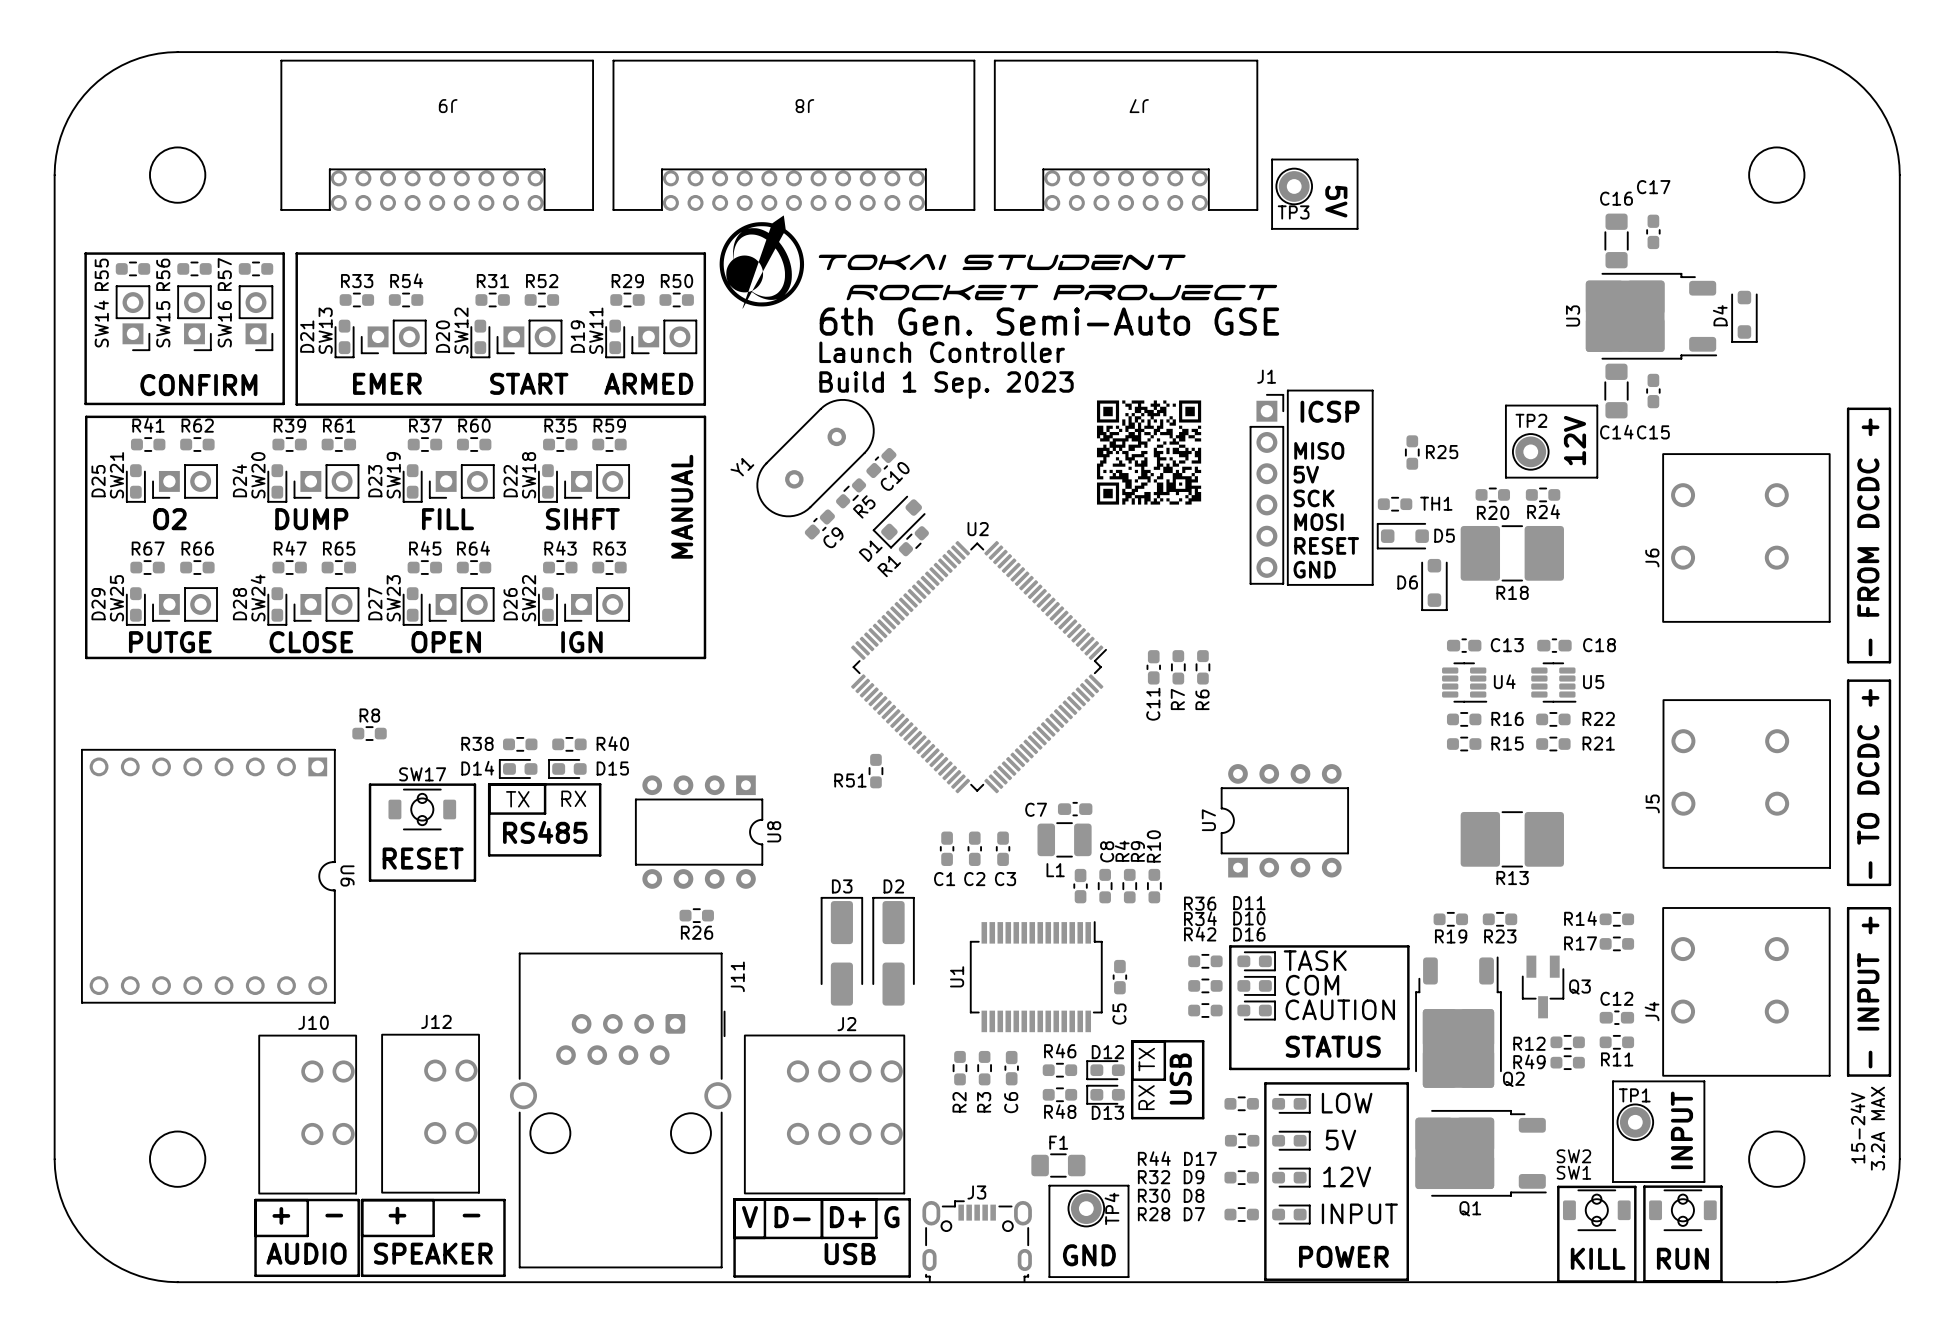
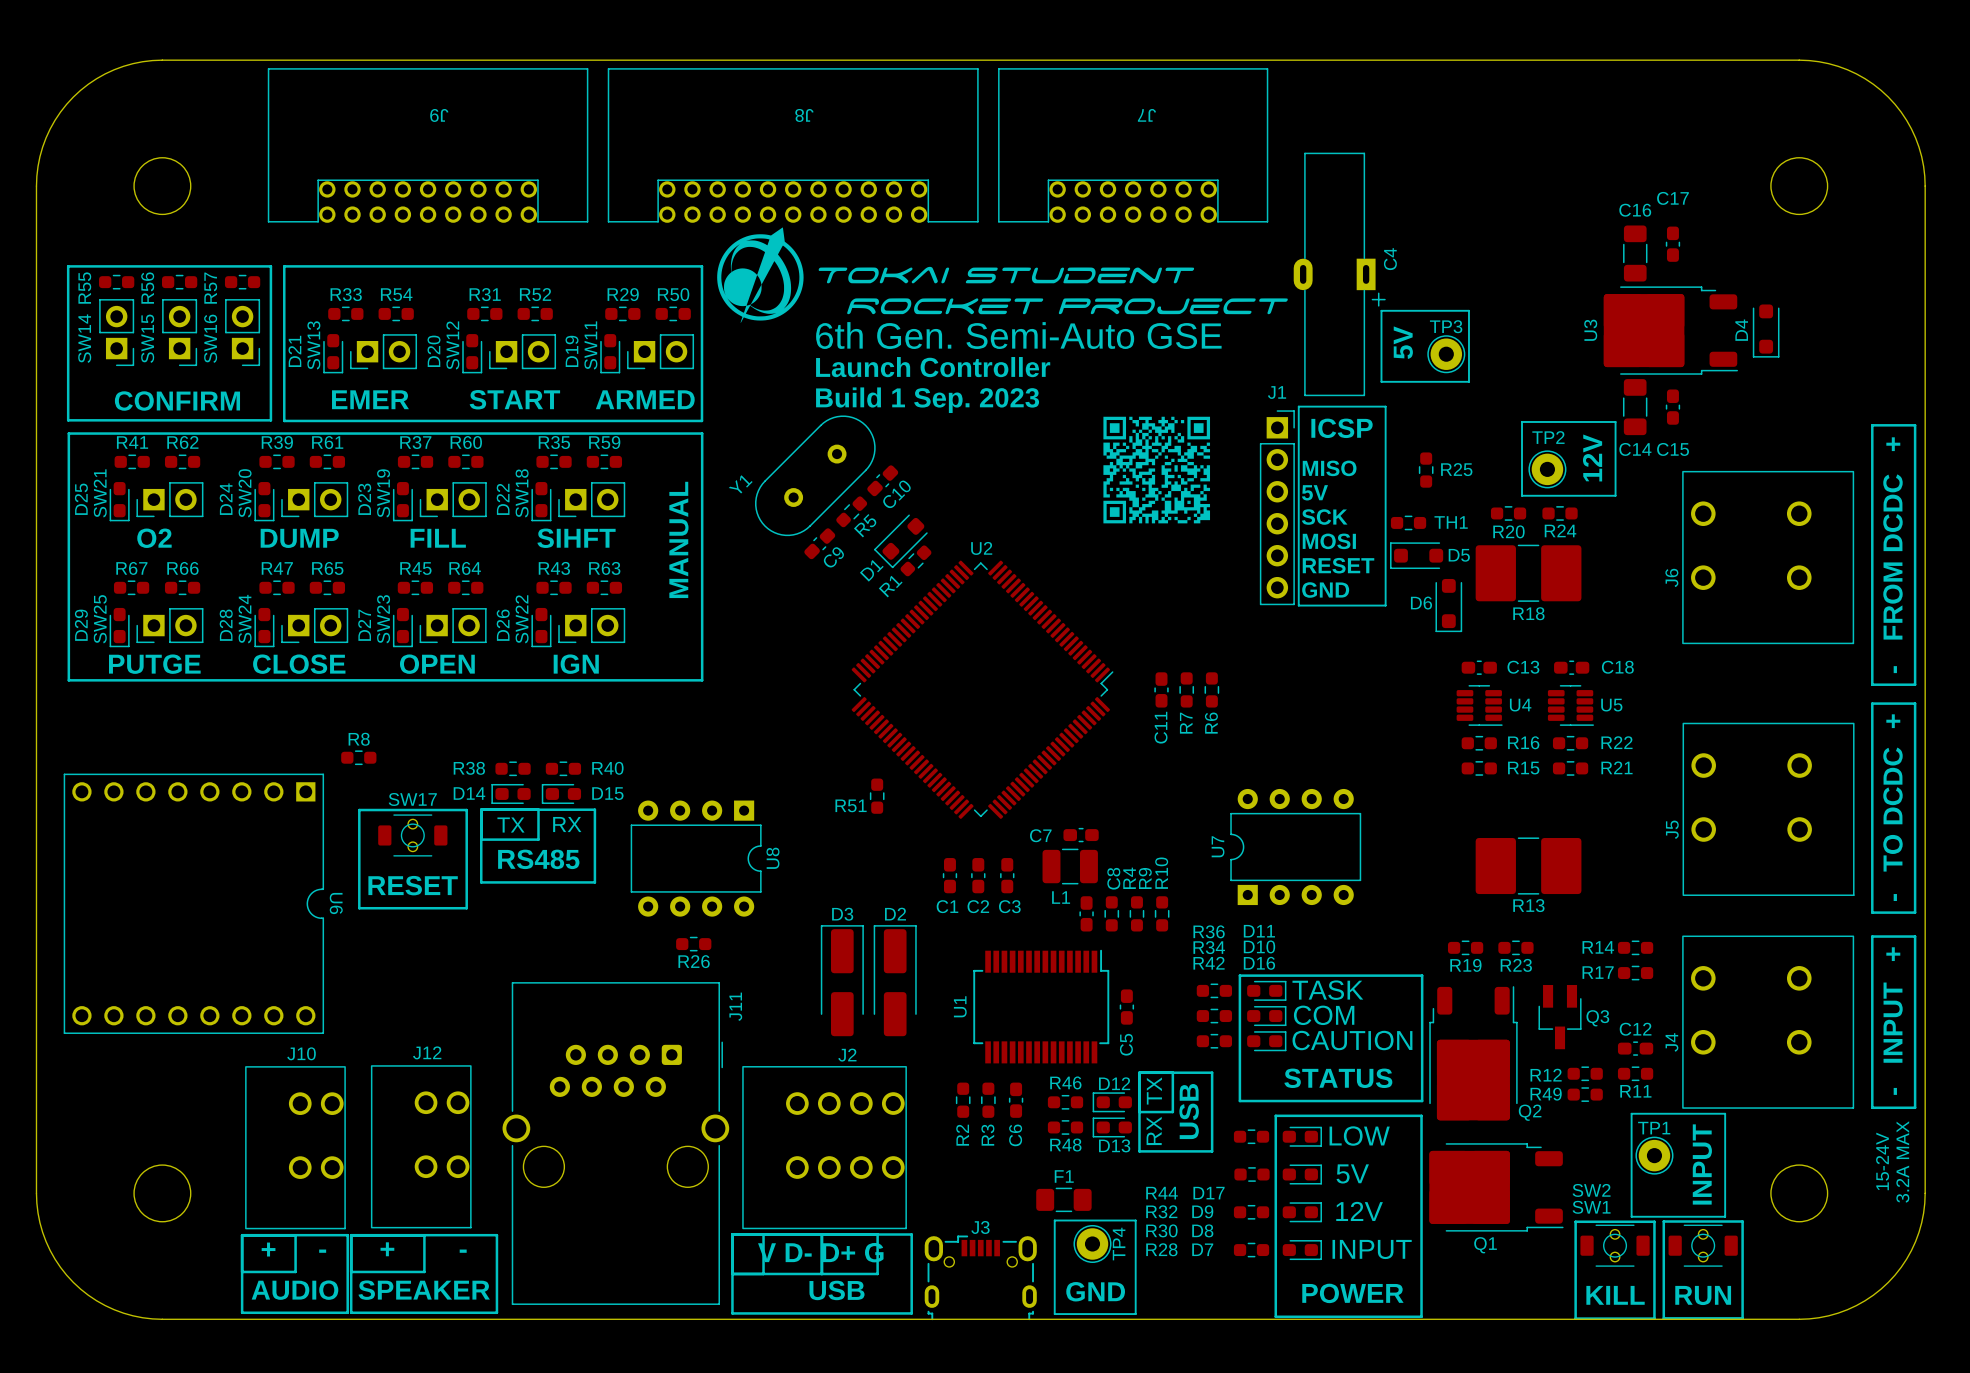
line: (1272, 159) (1272, 228) (1357, 228) (1357, 159) (1272, 159) -> (1381, 310) (1381, 381) (1468, 381) (1468, 310) (1381, 310)
TP3 position: (1294, 186) -> (1446, 354)
text rotation: 0° (1336, 201) -> 180° (1403, 342)
text position: 5V (1336, 201) -> 5V (1403, 342)
TP3 name position: TP3 (1293, 212) -> TP3 (1446, 326)
C4: none -> (1339, 274)

